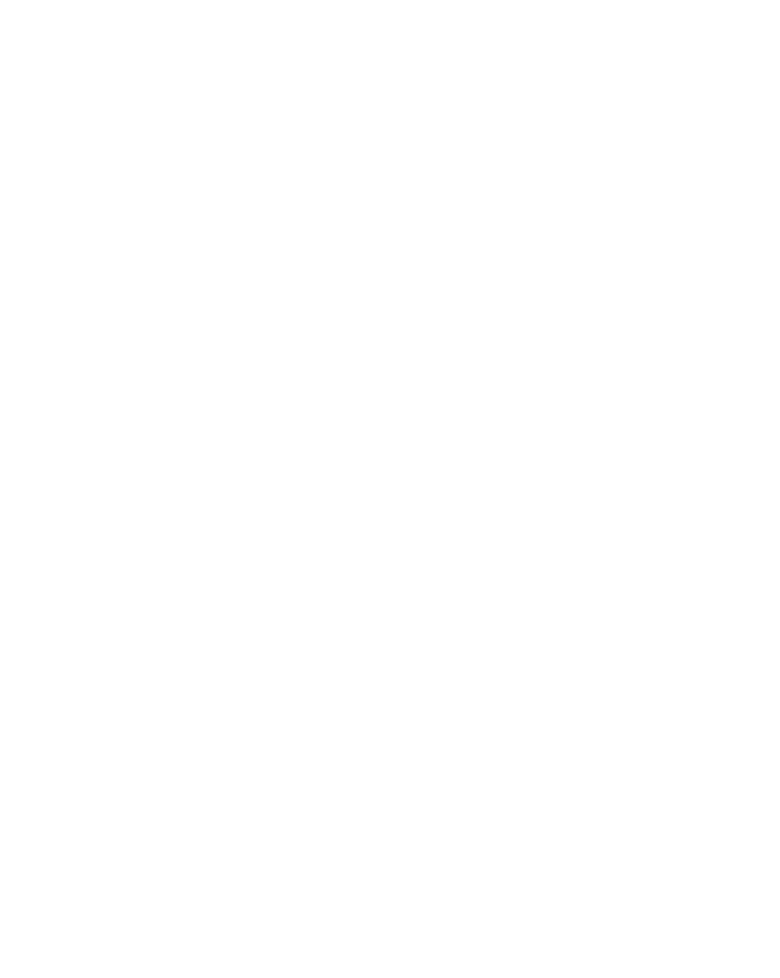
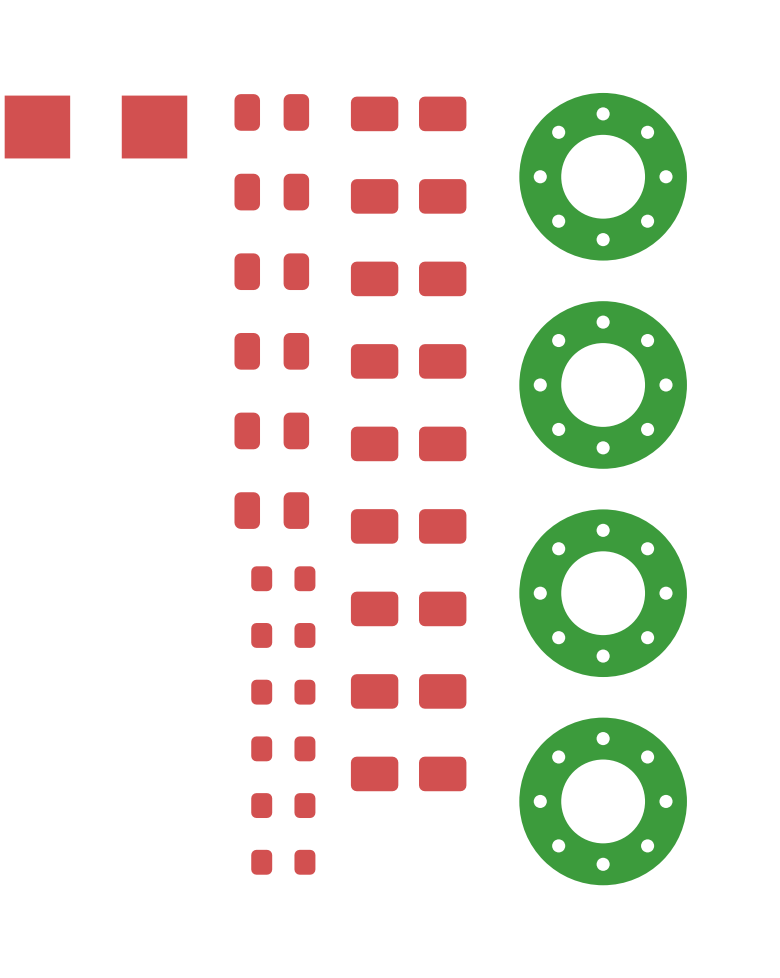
part: none -> (271, 112)
part: none -> (408, 113)
part: none -> (95, 127)
part: none -> (603, 176)
part: none -> (271, 192)
part: none -> (408, 196)
part: none -> (271, 271)
part: none -> (408, 278)
part: none -> (271, 351)
part: none -> (408, 361)
part: none -> (603, 384)
part: none -> (271, 430)
part: none -> (408, 443)
part: none -> (271, 510)
part: none -> (408, 526)
part: none -> (283, 578)
part: none -> (603, 593)
part: none -> (408, 608)
part: none -> (283, 635)
part: none -> (408, 691)
part: none -> (283, 692)
part: none -> (283, 748)
part: none -> (408, 773)
part: none -> (603, 801)
part: none -> (283, 805)
part: none -> (283, 862)

